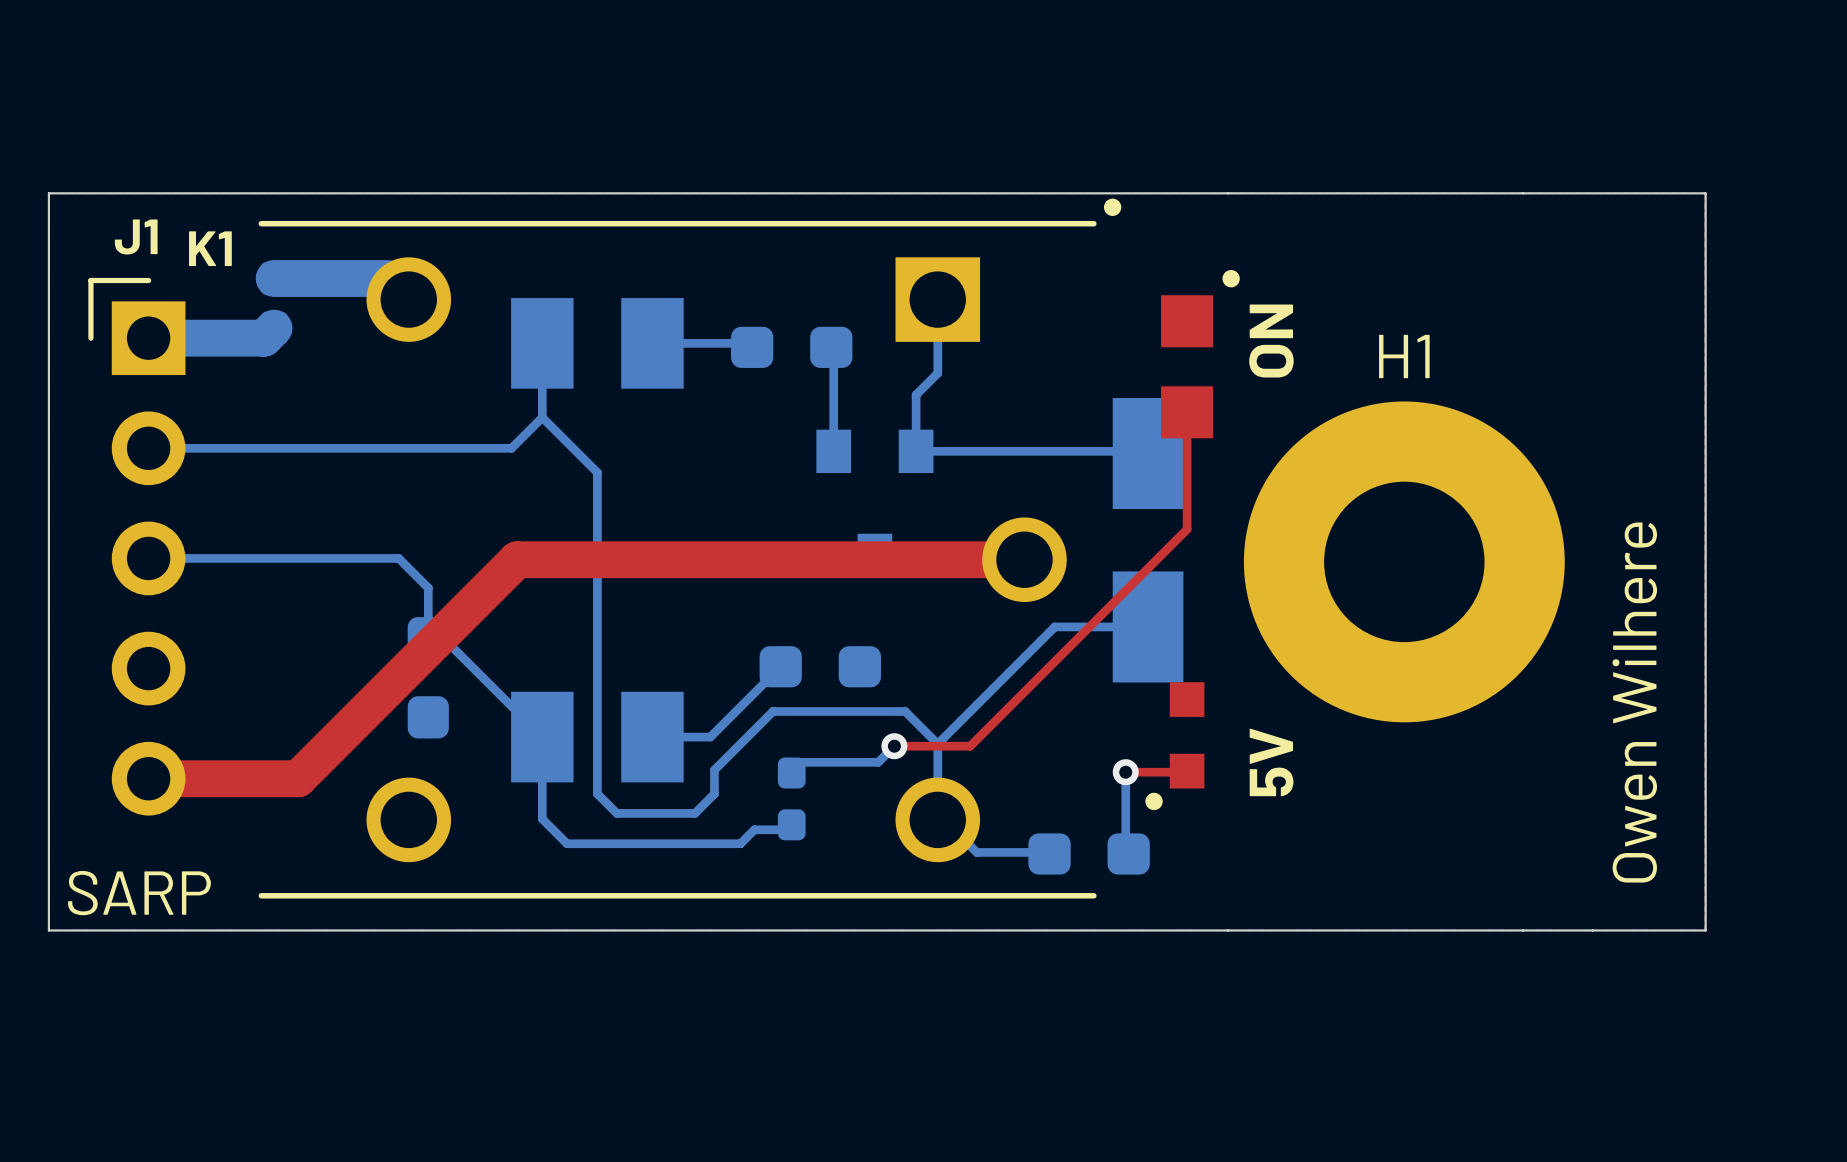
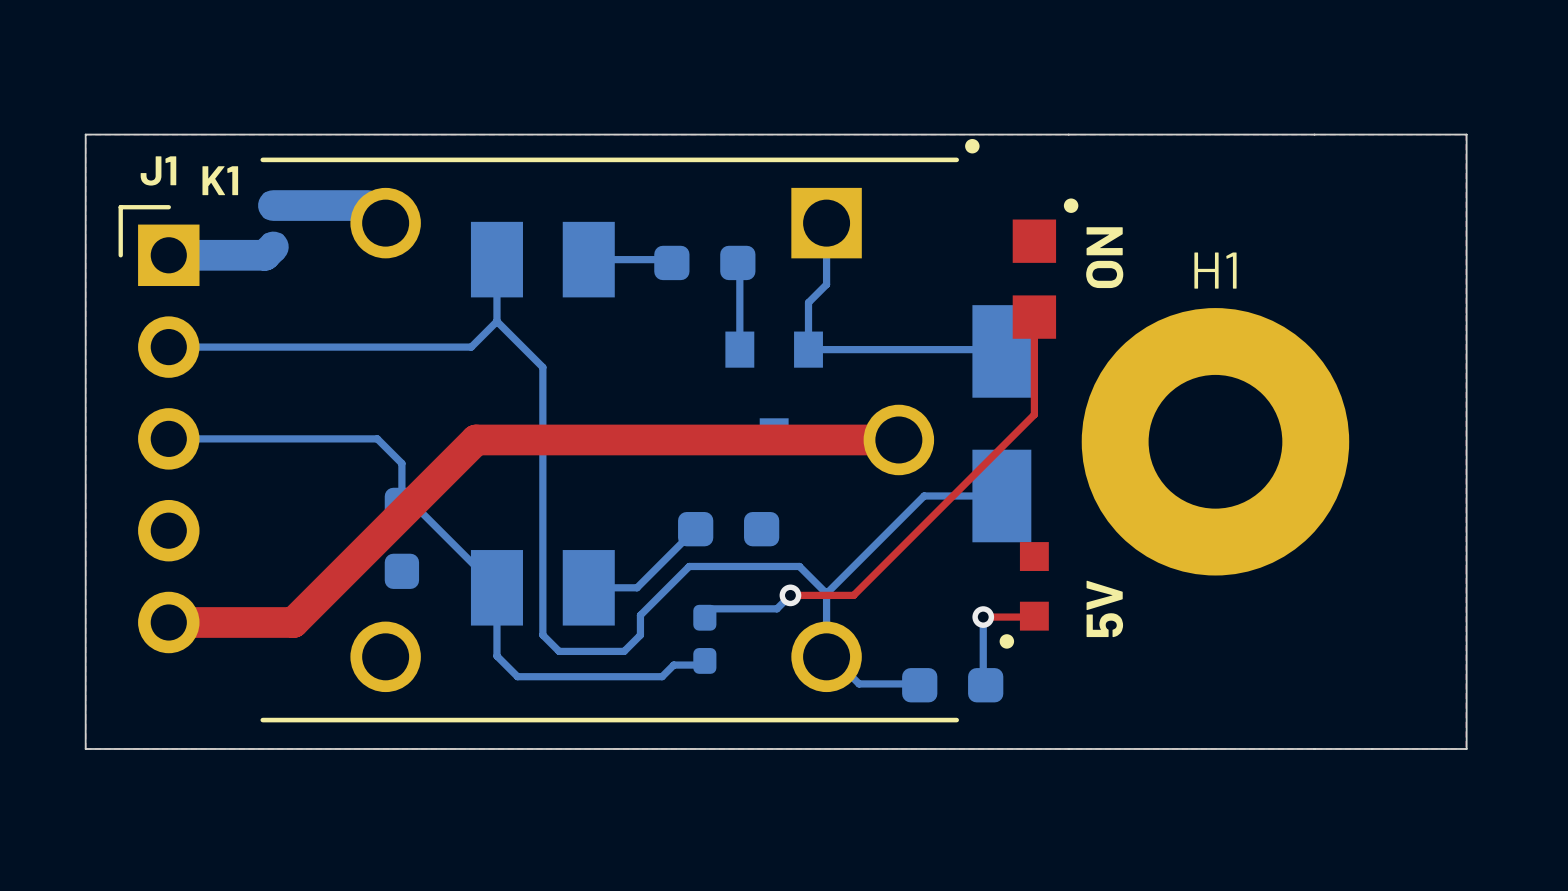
text: Owen Wilhere (1634, 702) -> none
text: SARP (139, 893) -> none

